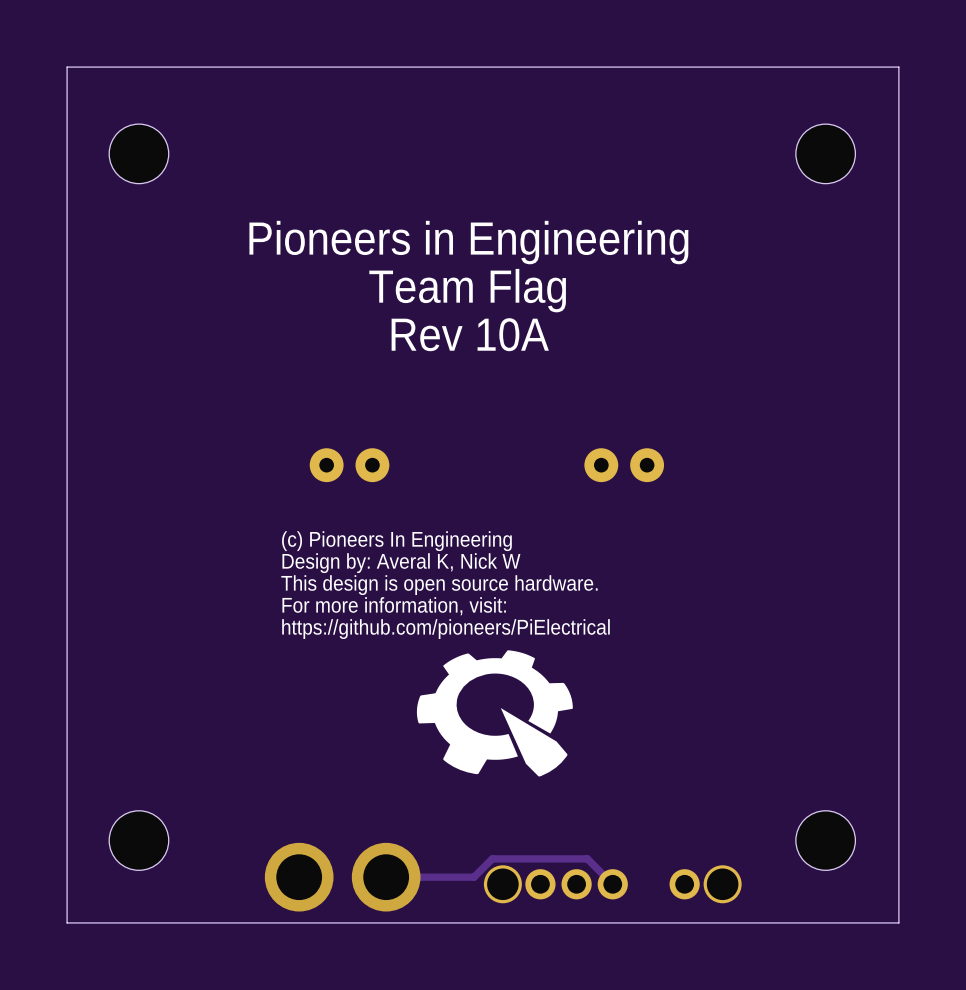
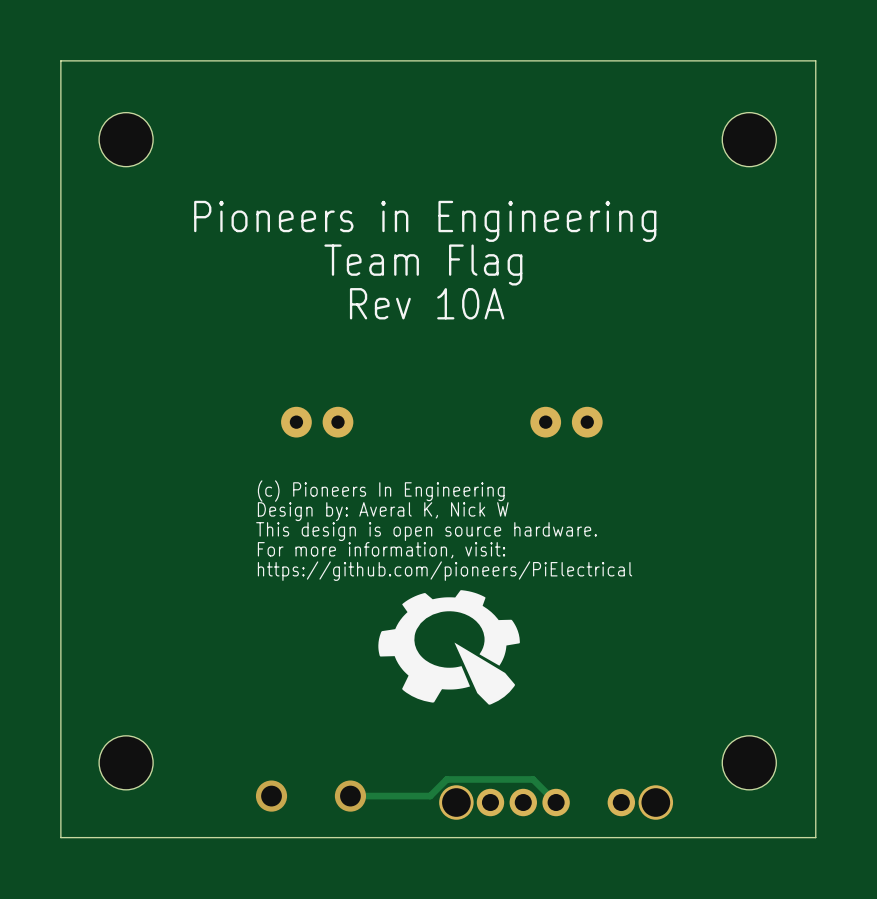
via size: [264, 842, 334, 912] -> [255, 780, 288, 812]
via size: [351, 842, 421, 912] -> [334, 780, 367, 812]

